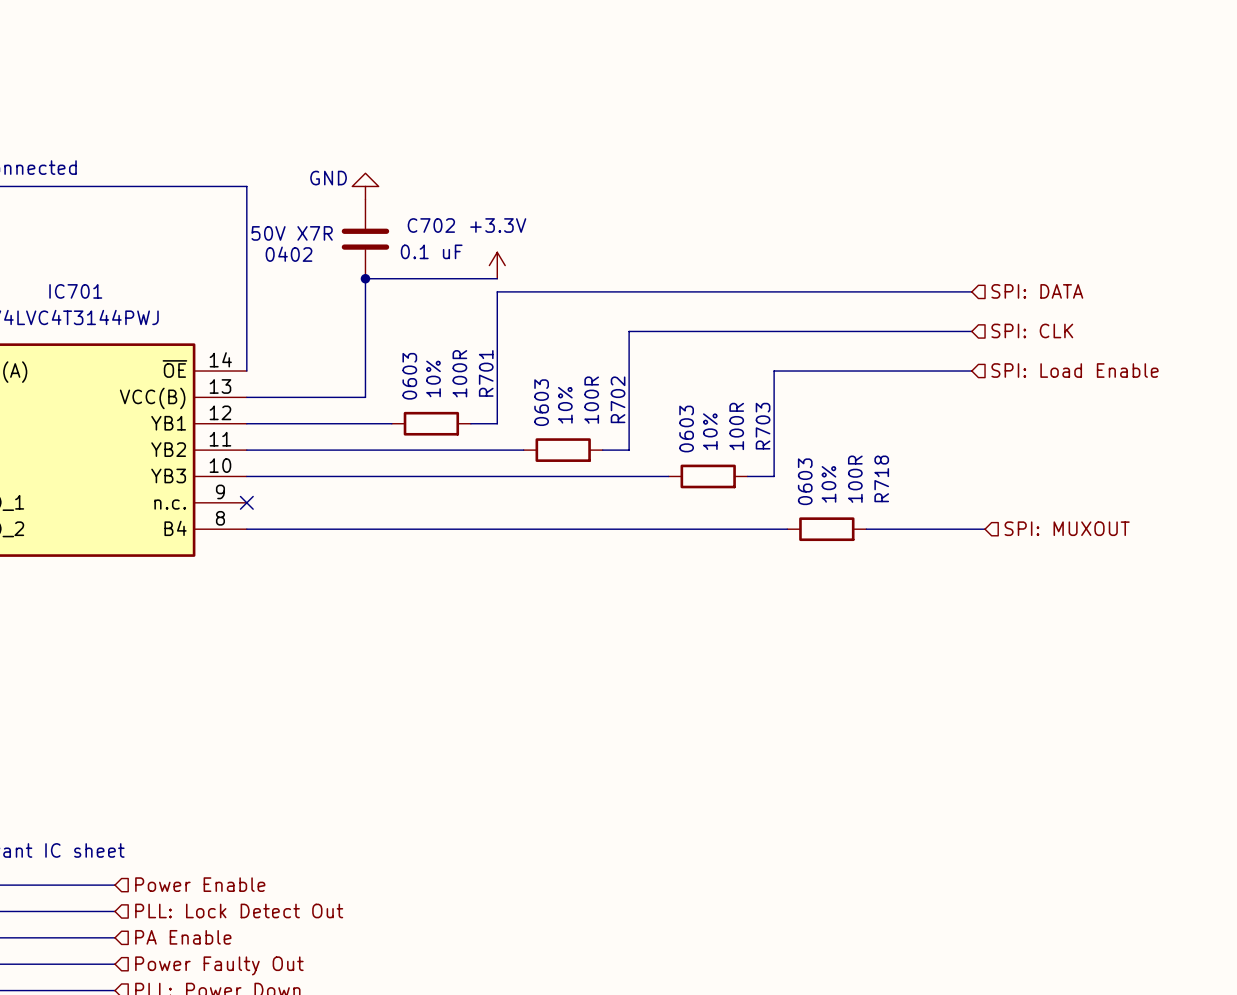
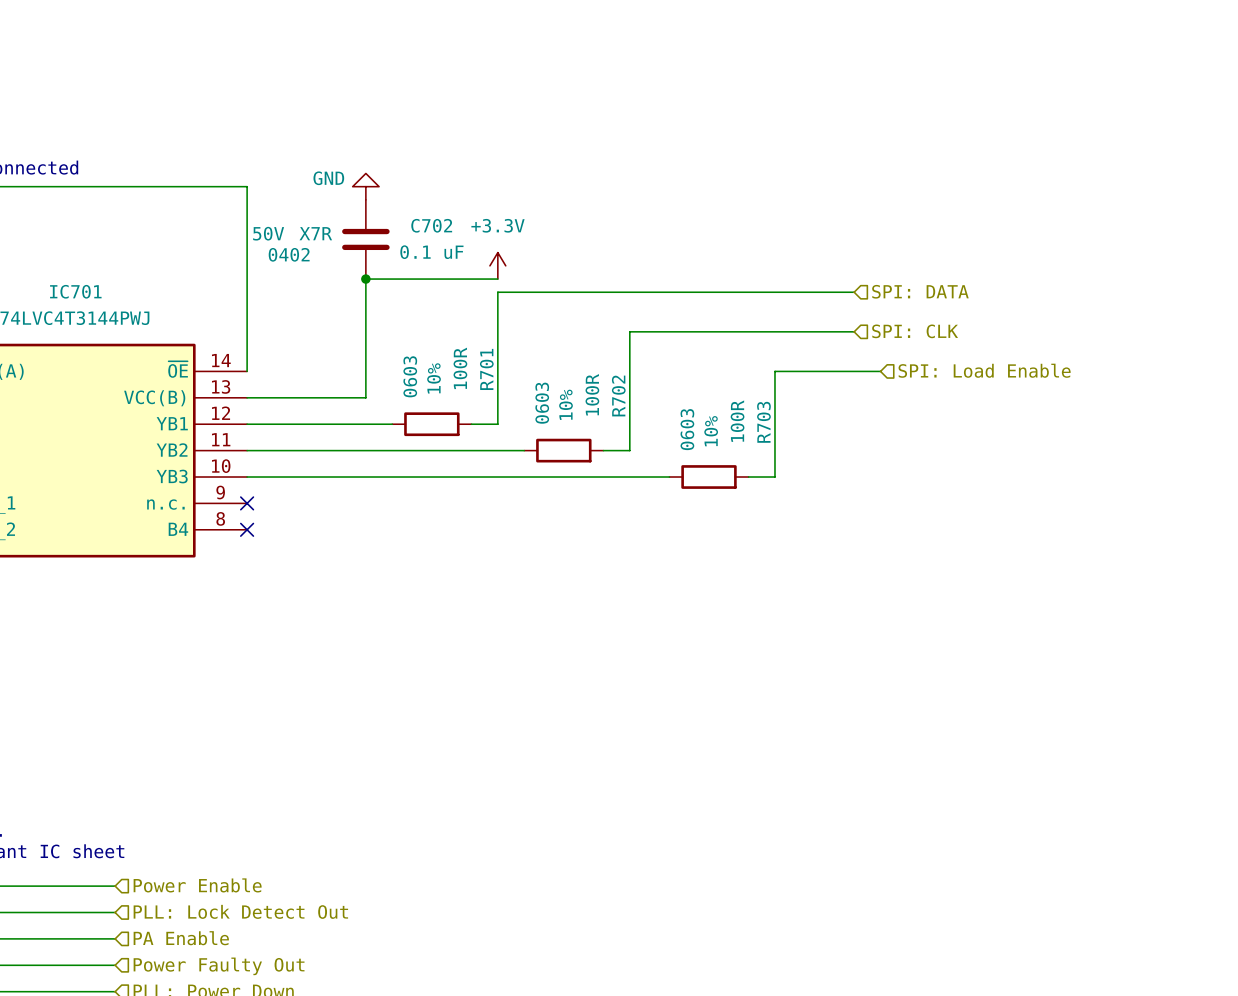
wire: (853, 291) (971, 291) -> none
hierarchical label position: SPI: DATA (1037, 291) -> SPI: DATA (920, 291)
hierarchical label position: SPI: CLK (1032, 330) -> SPI: CLK (915, 331)
wire: (853, 331) (971, 331) -> none
hierarchical label position: SPI: Load Enable (1074, 370) -> SPI: Load Enable (984, 370)
wire: (879, 371) (971, 371) -> none
hierarchical label: SPI: MUXOUT (1067, 528) -> none
wire: (246, 529) (787, 529) -> none
no-connect mark: none -> (247, 529)
R718: 100R (826, 529) -> none
wire: (866, 529) (985, 529) -> none

